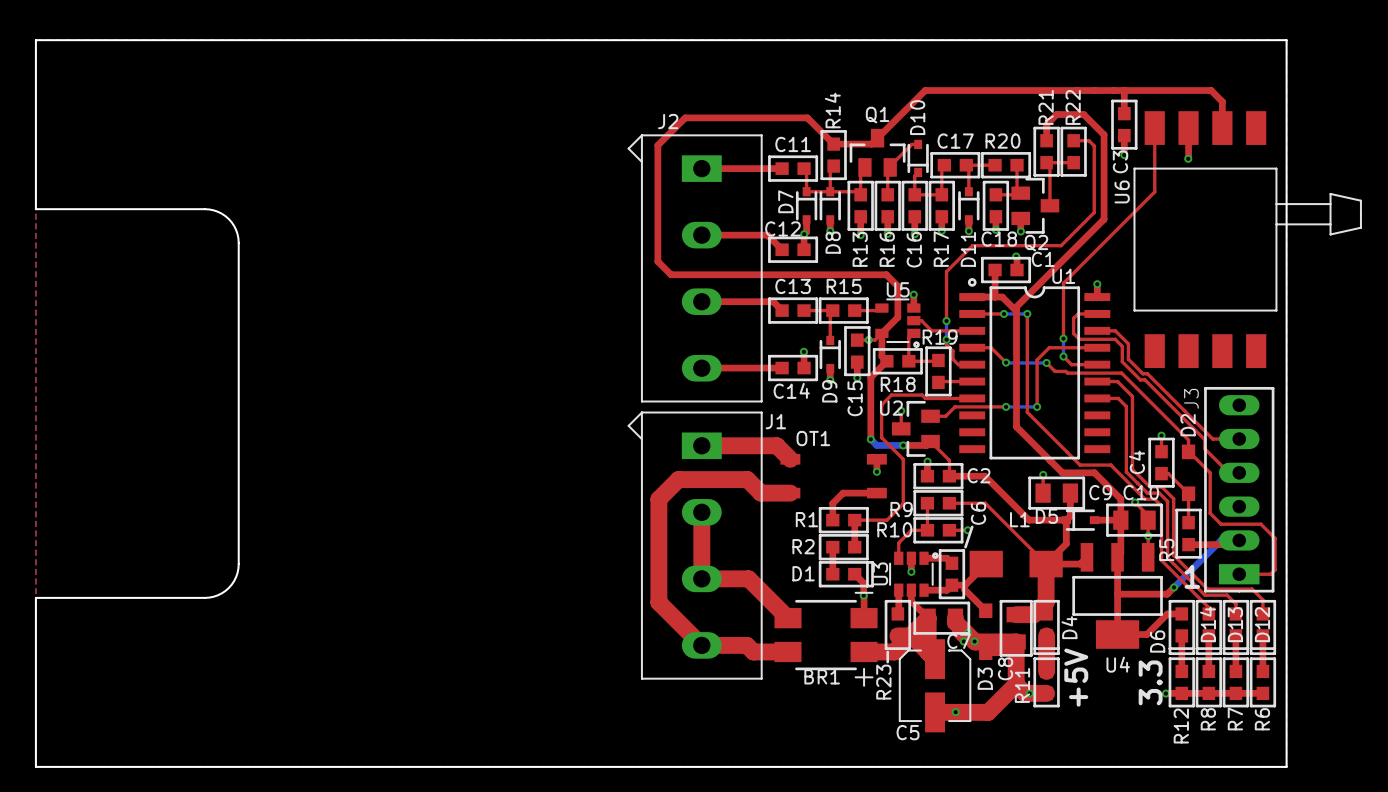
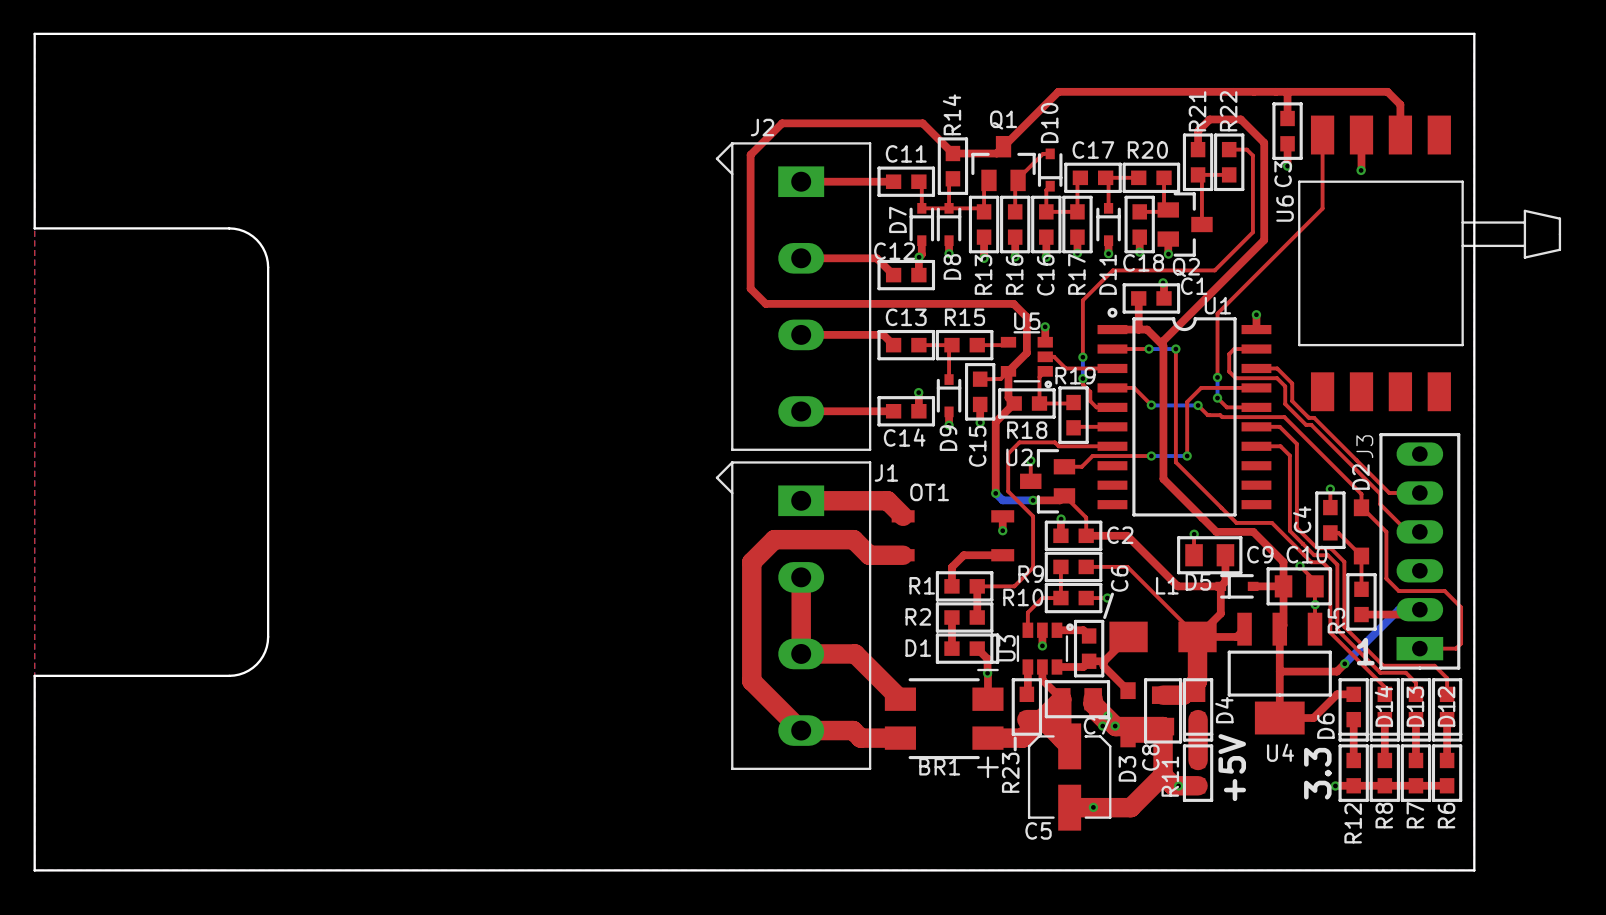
via: (868, 339) -> none

